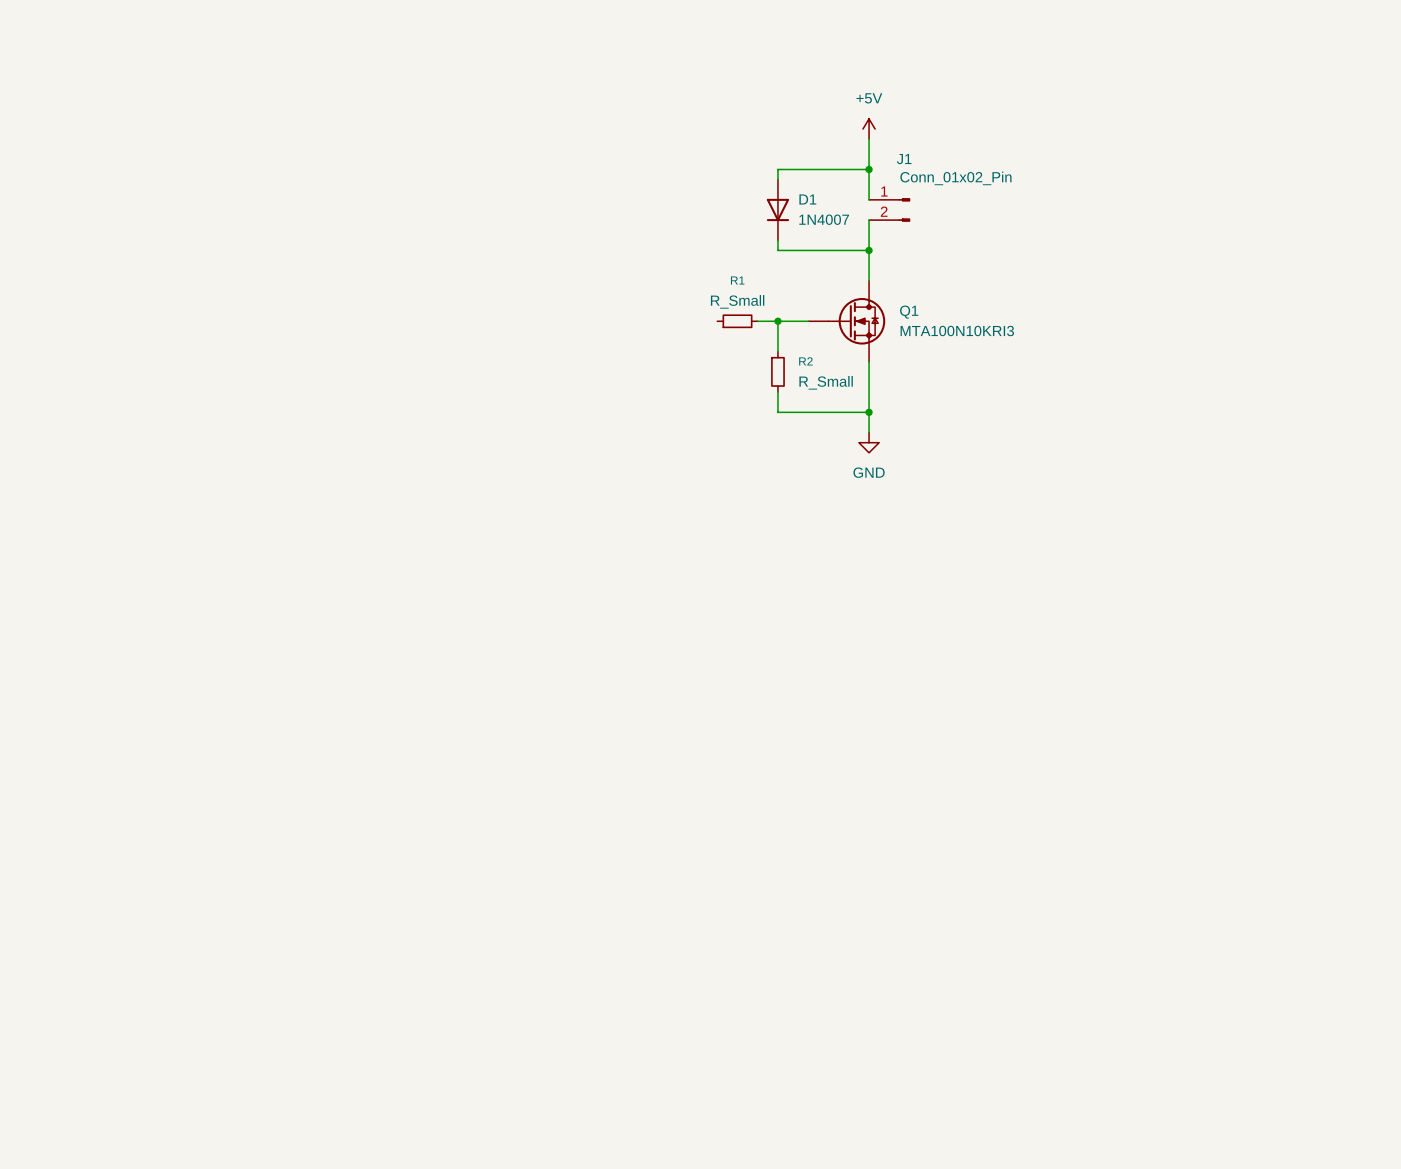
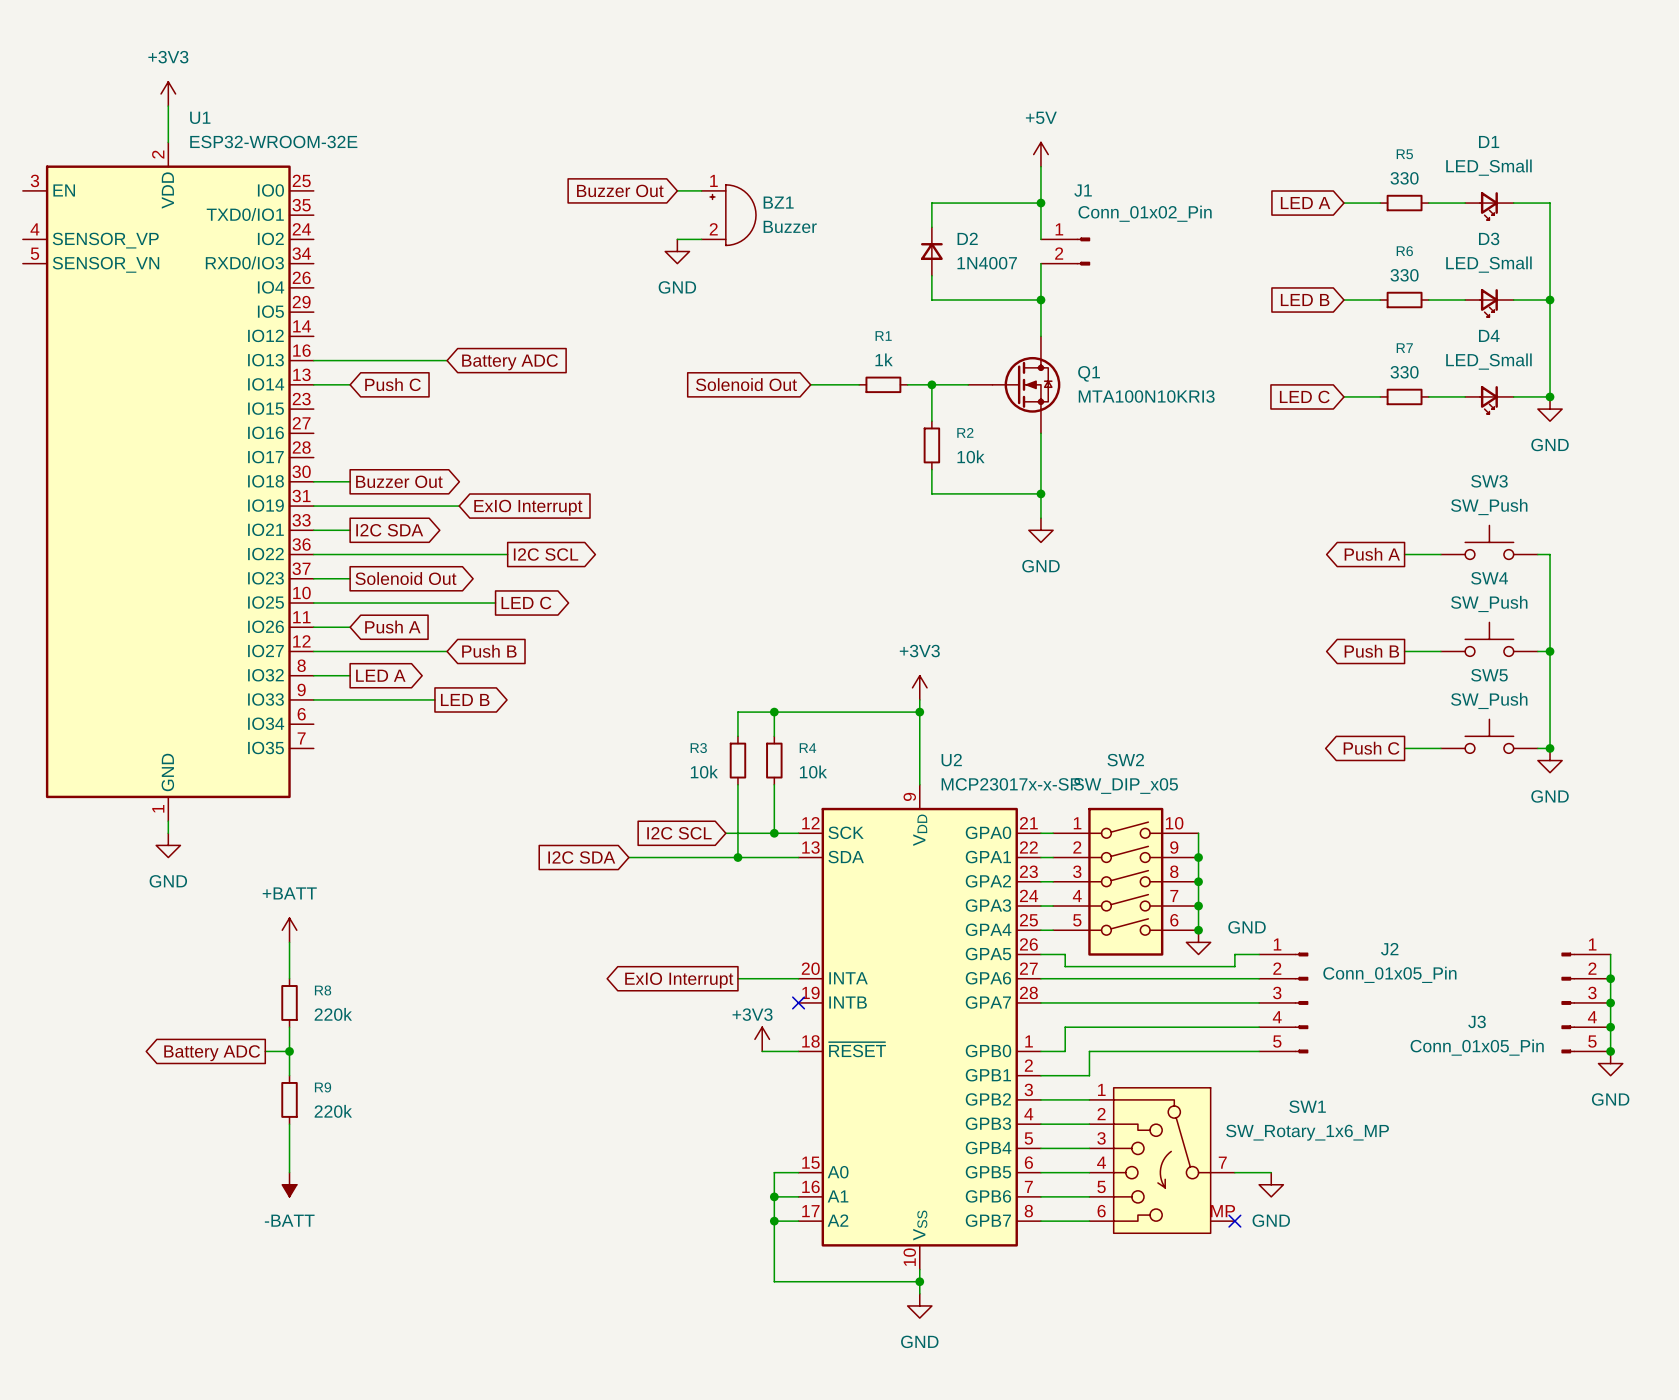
power symbol: none -> +3V3 (168, 93)
wire: none -> (168, 106) (168, 142)
global label: none -> Buzzer Out (620, 190)
wire: none -> (677, 190) (701, 190)
global label: none -> LED A (1305, 203)
wire: none -> (1343, 203) (1380, 203)
R5: none -> 330 (1404, 203)
wire: none -> (1428, 203) (1465, 203)
wire: none -> (1513, 203) (1550, 203) (1550, 396) (1513, 396)
BZ1: none -> Buzzer (728, 215)
D1 symbol: [766, 179, 790, 241] -> [1465, 192, 1514, 221]
wire: none -> (677, 239) (701, 239)
D1 name position: D1 (807, 199) -> D1 (1489, 141)
power symbol: none -> GND (677, 251)
D2: none -> 1N4007 (931, 251)
D1 value: 1N4007 (824, 219) -> LED_Small (1488, 167)
global label: none -> LED B (1305, 300)
wire: none -> (1343, 300) (1380, 300)
R6: none -> 330 (1404, 300)
wire: none -> (1428, 300) (1465, 300)
wire: none -> (1513, 300) (1550, 300)
junction: none -> (1550, 300)
D3: none -> LED_Small (1489, 303)
wire: none -> (313, 360) (447, 360)
R1 value: R_Small (737, 301) -> 1k (884, 359)
global label: none -> Battery ADC (510, 362)
wire: none -> (313, 384) (350, 384)
global label: none -> Push C (393, 384)
global label: none -> Solenoid Out (746, 384)
wire: none -> (810, 384) (859, 384)
global label: none -> LED C (1304, 396)
wire: none -> (1343, 396) (1380, 396)
R7: none -> 330 (1404, 396)
wire: none -> (1428, 396) (1465, 396)
junction: none -> (1550, 396)
D4: none -> LED_Small (1489, 399)
power symbol: none -> GND (1550, 409)
R2 value: R_Small (826, 382) -> 10k (971, 456)
U1: none -> ESP32-WROOM-32E (168, 481)
wire: none -> (313, 481) (350, 481)
global label: none -> Buzzer Out (399, 481)
wire: none -> (313, 506) (459, 506)
global label: none -> ExIO Interrupt (528, 507)
wire: none -> (313, 530) (350, 530)
global label: none -> I2C SDA (389, 530)
SW3: none -> SW_Push (1489, 542)
wire: none -> (313, 554) (507, 554)
global label: none -> I2C SCL (546, 554)
global label: none -> Push A (1372, 554)
wire: none -> (1404, 554) (1440, 554)
wire: none -> (1537, 554) (1550, 554) (1550, 748) (1537, 748)
global label: none -> Solenoid Out (405, 578)
wire: none -> (313, 578) (350, 578)
wire: none -> (313, 603) (495, 603)
global label: none -> LED C (526, 603)
wire: none -> (313, 627) (350, 627)
global label: none -> Push A (392, 627)
SW4: none -> SW_Push (1489, 639)
wire: none -> (313, 651) (447, 651)
global label: none -> Push B (489, 651)
global label: none -> Push B (1371, 651)
wire: none -> (1404, 651) (1440, 651)
wire: none -> (1537, 651) (1550, 651)
junction: none -> (1550, 651)
wire: none -> (313, 675) (350, 675)
global label: none -> LED A (380, 675)
power symbol: none -> +3V3 (919, 687)
wire: none -> (313, 699) (434, 699)
global label: none -> LED B (465, 699)
wire: none -> (919, 699) (919, 784)
wire: none -> (774, 712) (774, 736)
junction: none -> (774, 712)
wire: none -> (919, 712) (737, 712) (737, 736)
junction: none -> (919, 712)
SW5: none -> SW_Push (1489, 736)
global label: none -> Push C (1371, 748)
wire: none -> (1404, 748) (1440, 748)
junction: none -> (1550, 748)
R3: none -> 10k (737, 760)
R4: none -> 10k (774, 760)
power symbol: none -> GND (1550, 760)
wire: none -> (737, 784) (737, 857)
wire: none -> (774, 784) (774, 833)
wire: none -> (168, 821) (168, 833)
global label: none -> I2C SCL (679, 833)
wire: none -> (725, 833) (798, 833)
junction: none -> (774, 833)
wire: none -> (1040, 833) (1053, 833)
wire: none -> (1198, 833) (1198, 930)
power symbol: none -> GND (168, 845)
global label: none -> I2C SDA (581, 857)
wire: none -> (628, 857) (798, 857)
junction: none -> (737, 857)
wire: none -> (1040, 857) (1053, 857)
junction: none -> (1198, 857)
wire: none -> (1040, 881) (1053, 881)
SW2: none -> SW_DIP_x05 (1125, 881)
junction: none -> (1198, 881)
wire: none -> (1040, 906) (1053, 906)
junction: none -> (1198, 906)
power symbol: none -> +BATT (289, 930)
wire: none -> (1040, 930) (1053, 930)
junction: none -> (1198, 930)
wire: none -> (289, 942) (289, 978)
power symbol: none -> GND (1198, 942)
wire: none -> (1040, 954) (1065, 954) (1065, 966) (1234, 966) (1234, 954) (1259, 954)
wire: none -> (1610, 954) (1610, 1051)
wire: none -> (737, 978) (798, 978)
wire: none -> (1040, 978) (1259, 978)
junction: none -> (1610, 978)
global label: none -> ExIO Interrupt (679, 980)
R8: none -> 220k (289, 1002)
no-connect mark: none -> (798, 1002)
wire: none -> (1040, 1002) (1259, 1002)
J2: none -> Conn_01x05_Pin (1283, 1002)
J3: none -> Conn_01x05_Pin (1586, 1002)
junction: none -> (1610, 1002)
wire: none -> (289, 1027) (289, 1075)
U2: none -> MCP23017x-x-SP (919, 1027)
wire: none -> (1259, 1027) (1065, 1027) (1065, 1051) (1040, 1051)
junction: none -> (1610, 1027)
power symbol: none -> +3V3 (762, 1039)
wire: none -> (265, 1051) (289, 1051)
junction: none -> (289, 1051)
wire: none -> (762, 1051) (798, 1051)
wire: none -> (1259, 1051) (1089, 1051) (1089, 1075) (1040, 1075)
junction: none -> (1610, 1051)
global label: none -> Battery ADC (212, 1053)
power symbol: none -> GND (1610, 1063)
R9: none -> 220k (289, 1099)
wire: none -> (1040, 1099) (1089, 1099)
wire: none -> (289, 1124) (289, 1172)
wire: none -> (1040, 1124) (1089, 1124)
wire: none -> (1040, 1148) (1089, 1148)
SW1: none -> SW_Rotary_1x6_MP (1162, 1160)
wire: none -> (798, 1172) (774, 1172) (774, 1281) (919, 1281)
wire: none -> (1040, 1172) (1089, 1172)
wire: none -> (1234, 1172) (1271, 1172)
power symbol: none -> -BATT (289, 1184)
power symbol: none -> GND (1271, 1184)
wire: none -> (774, 1196) (798, 1196)
junction: none -> (774, 1196)
wire: none -> (1040, 1196) (1089, 1196)
wire: none -> (774, 1221) (798, 1221)
junction: none -> (774, 1221)
wire: none -> (1040, 1221) (1089, 1221)
no-connect mark: none -> (1234, 1221)
wire: none -> (919, 1269) (919, 1293)
junction: none -> (919, 1281)
power symbol: none -> GND (919, 1305)

